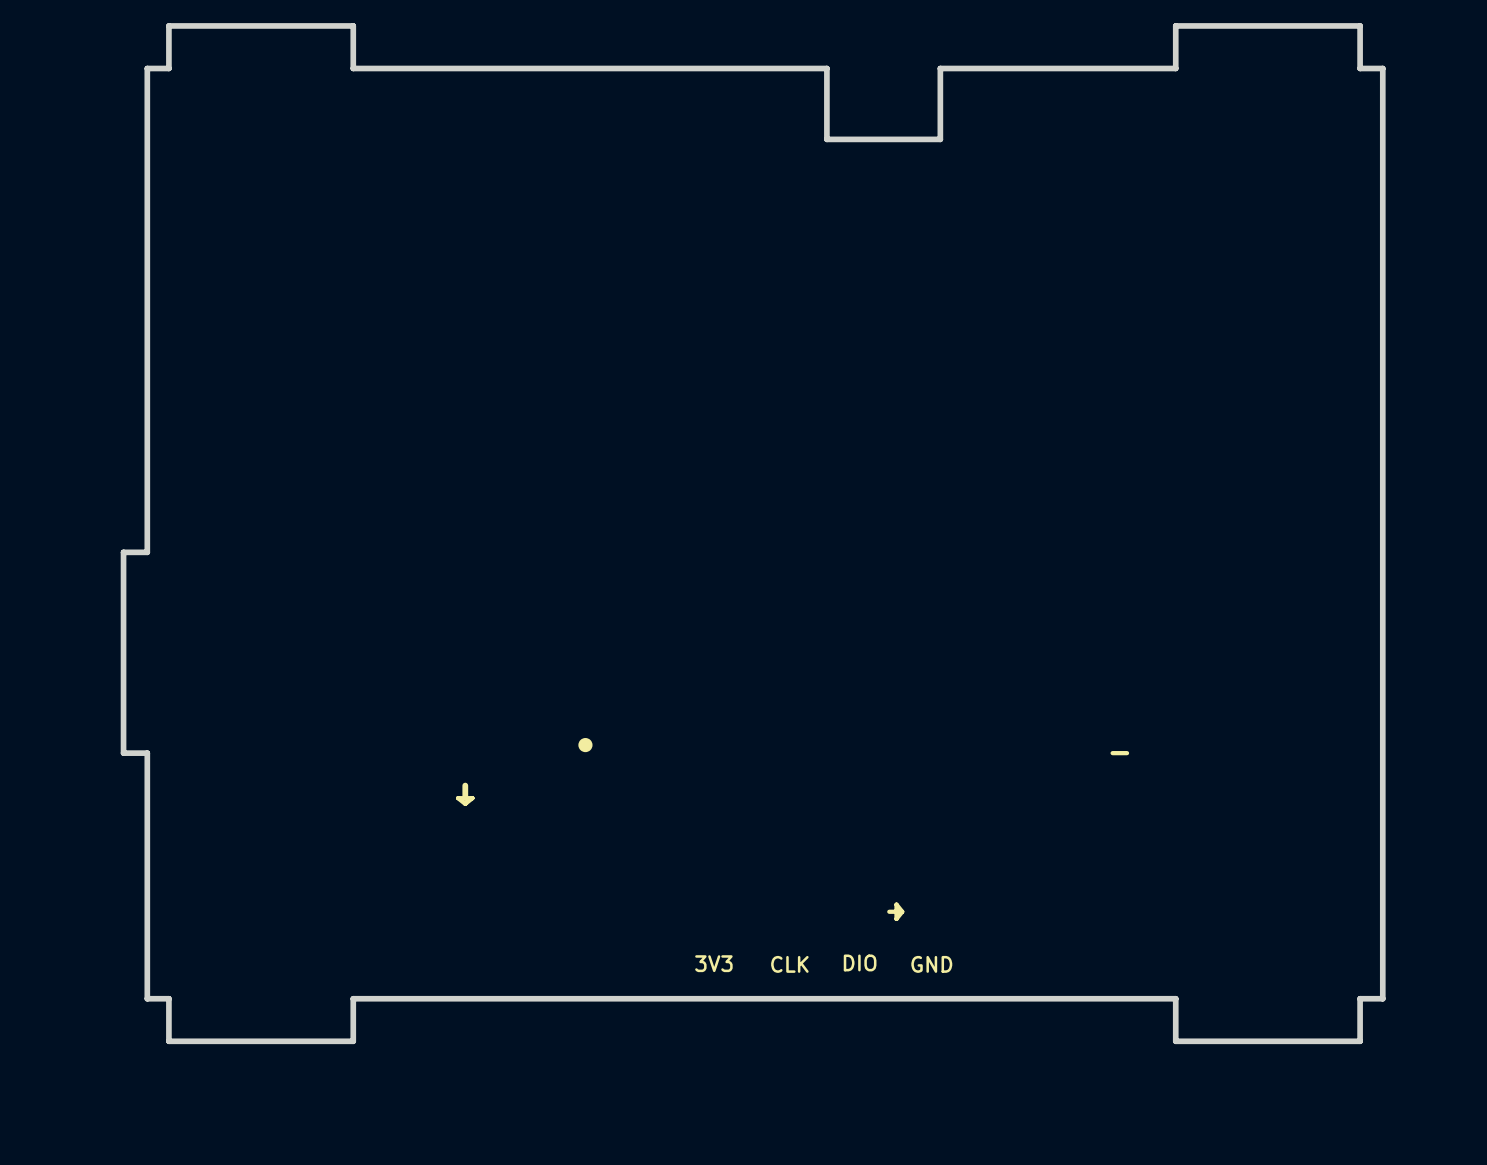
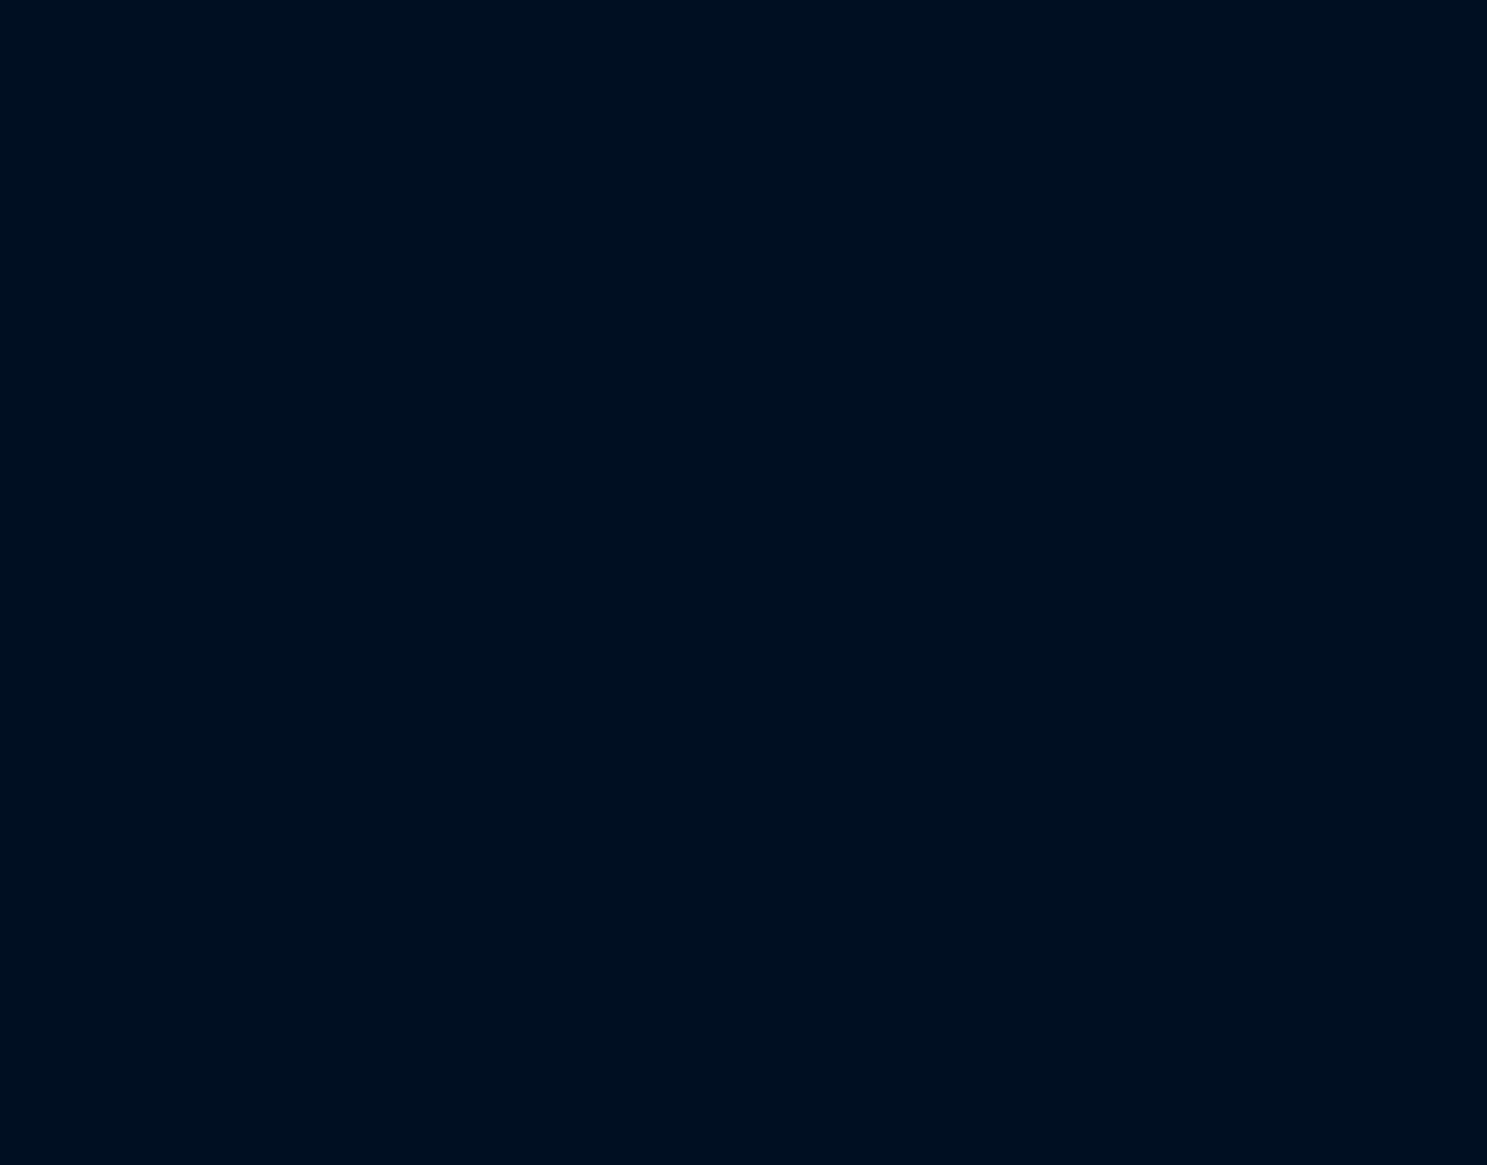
board edge: (168, 25) (168, 68) (147, 68) (147, 552) (123, 552) (123, 753) (147, 753) (147, 998) (168, 998) (168, 1041) (353, 1041) (353, 998) (1175, 998) (1175, 1041) (1360, 1041) (1360, 998) (1382, 998) (1382, 68) (1360, 68) (1360, 25) (1175, 25) (1175, 68) (940, 68) (940, 139) (826, 139) (826, 68) (353, 68) (353, 25) (168, 25) -> none
drawing: [578, 738, 593, 753] -> none
line: (1112, 753) (1127, 753) -> none
line: (465, 785) (465, 798) (472, 798) (465, 803) (458, 798) (463, 798) -> none
line: (889, 911) (896, 911) (896, 904) (902, 911) (896, 918) (896, 913) -> none
text: DIO (860, 962) -> none
text: 3V3 (713, 963) -> none
text: CLK (789, 964) -> none
text: GND (931, 964) -> none

